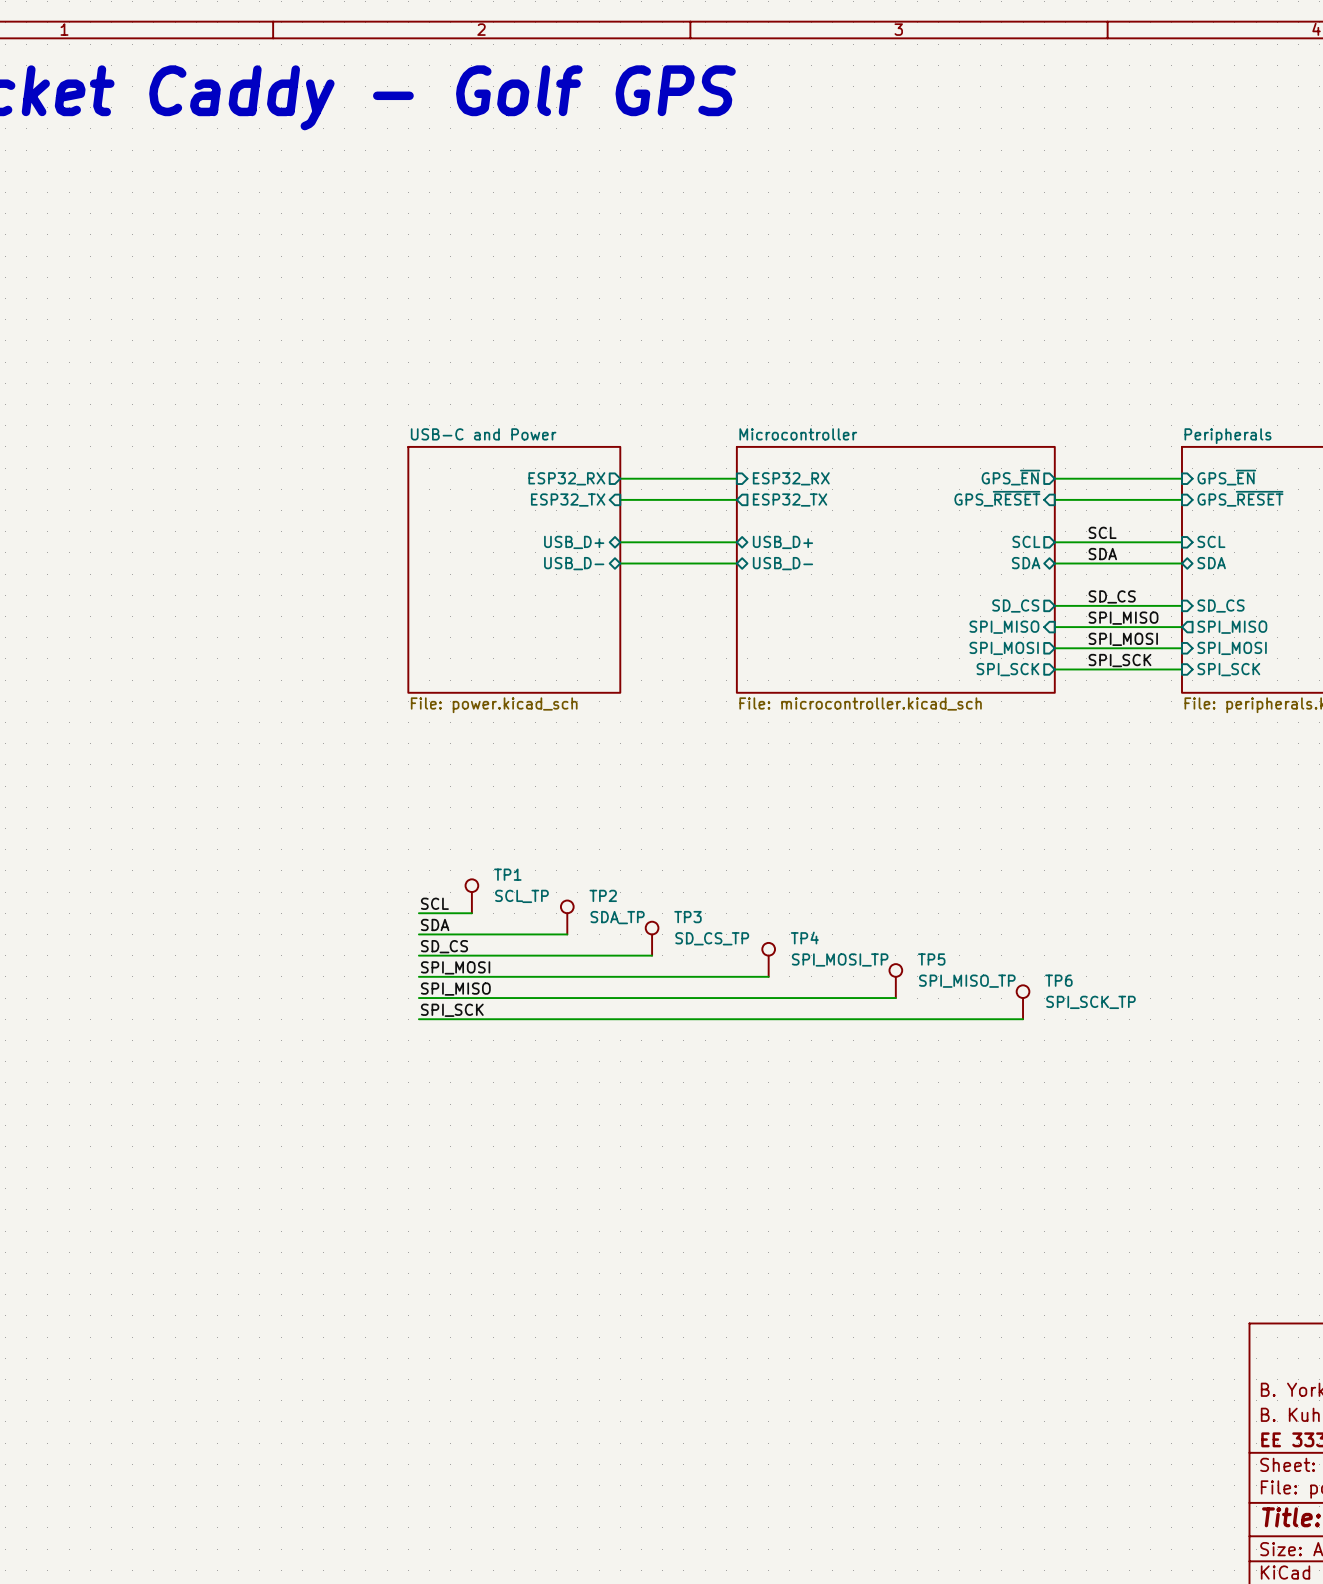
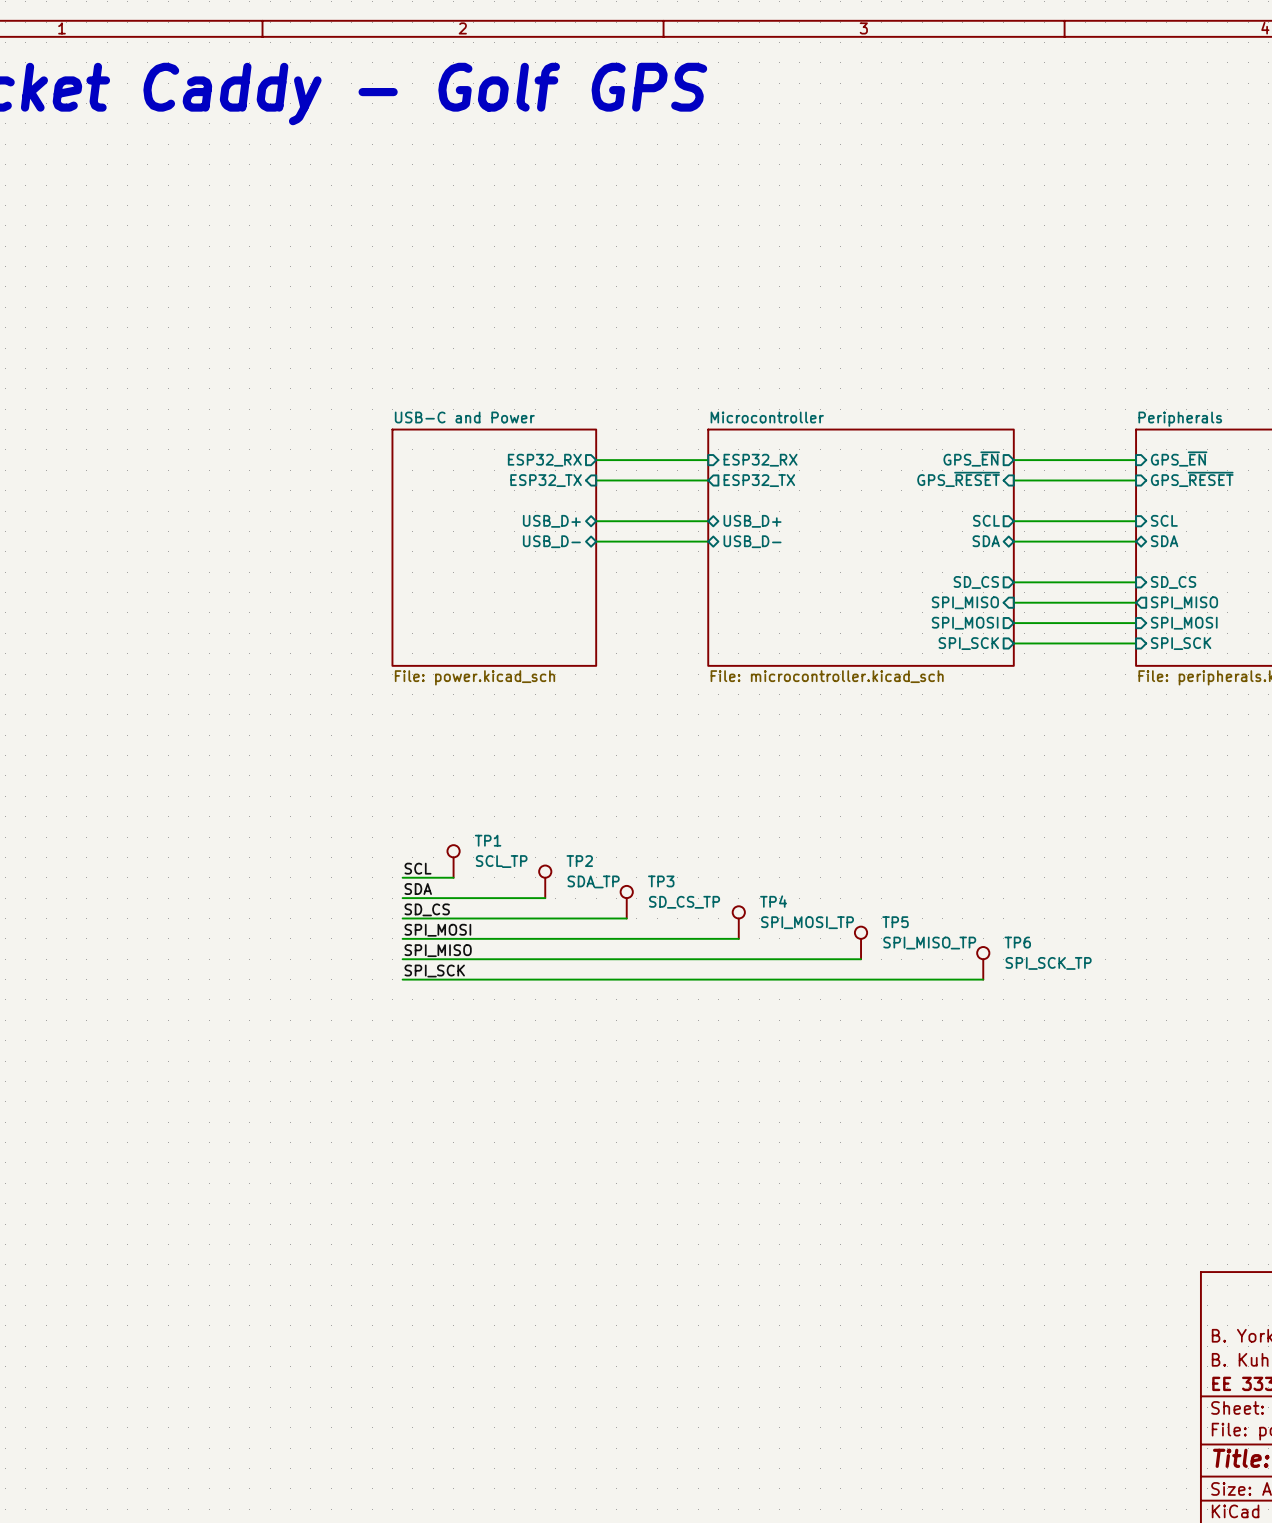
label: SCL (1102, 532) -> none
label: SDA (1102, 554) -> none
label: SD_CS (1112, 596) -> none
label: SPI_MISO (1123, 618) -> none
label: SPI_MOSI (1123, 639) -> none
label: SPI_SCK (1119, 660) -> none

